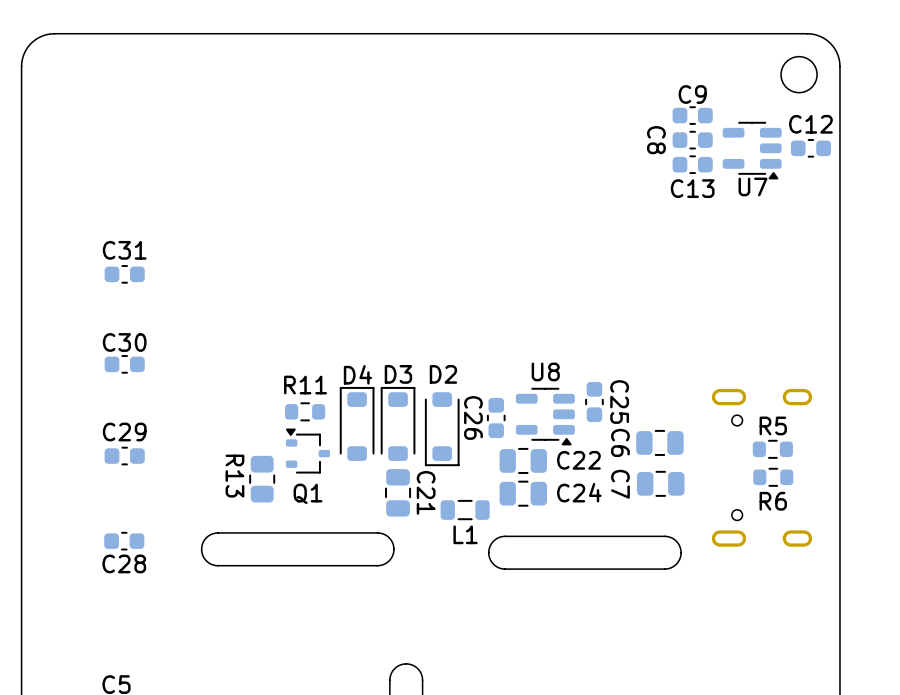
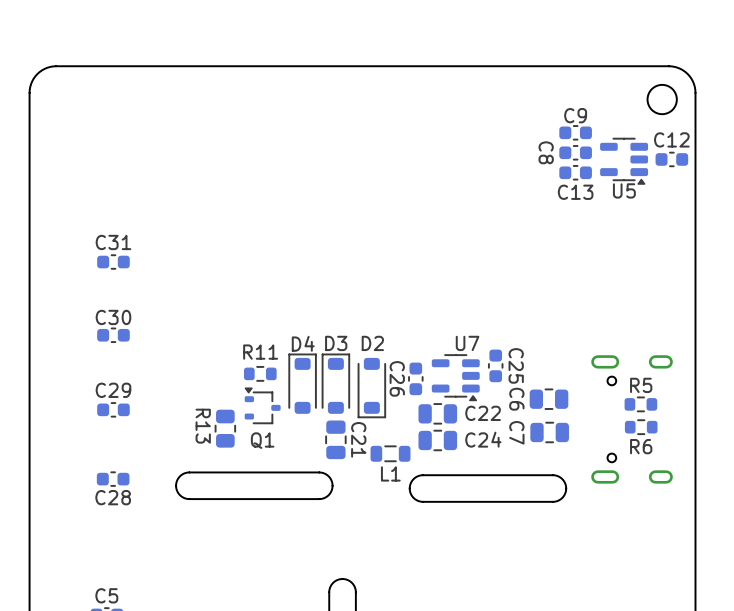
U7 name: U7 (752, 186) -> U5 (624, 190)
U8 name: U8 (545, 371) -> U7 (467, 343)

